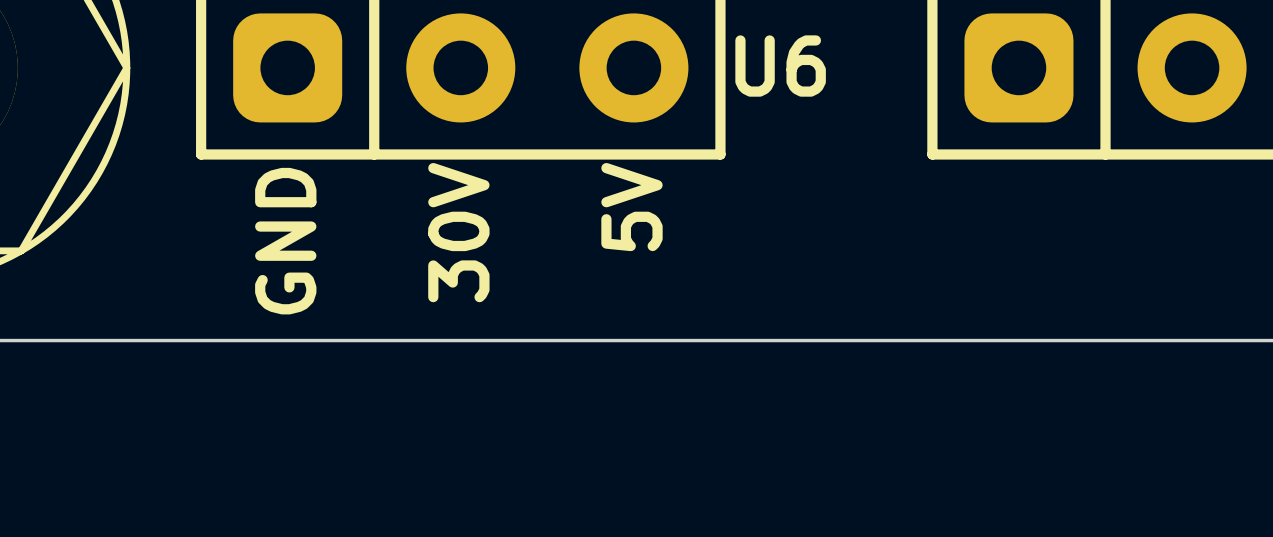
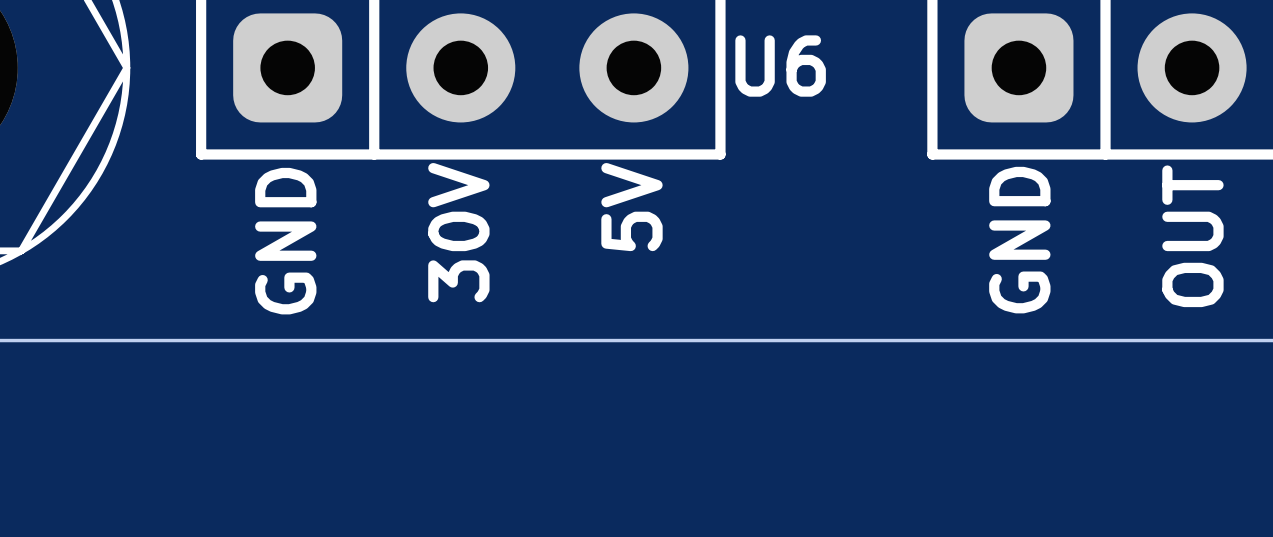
text: none -> OUT (1192, 236)
text: none -> GND (1019, 240)

